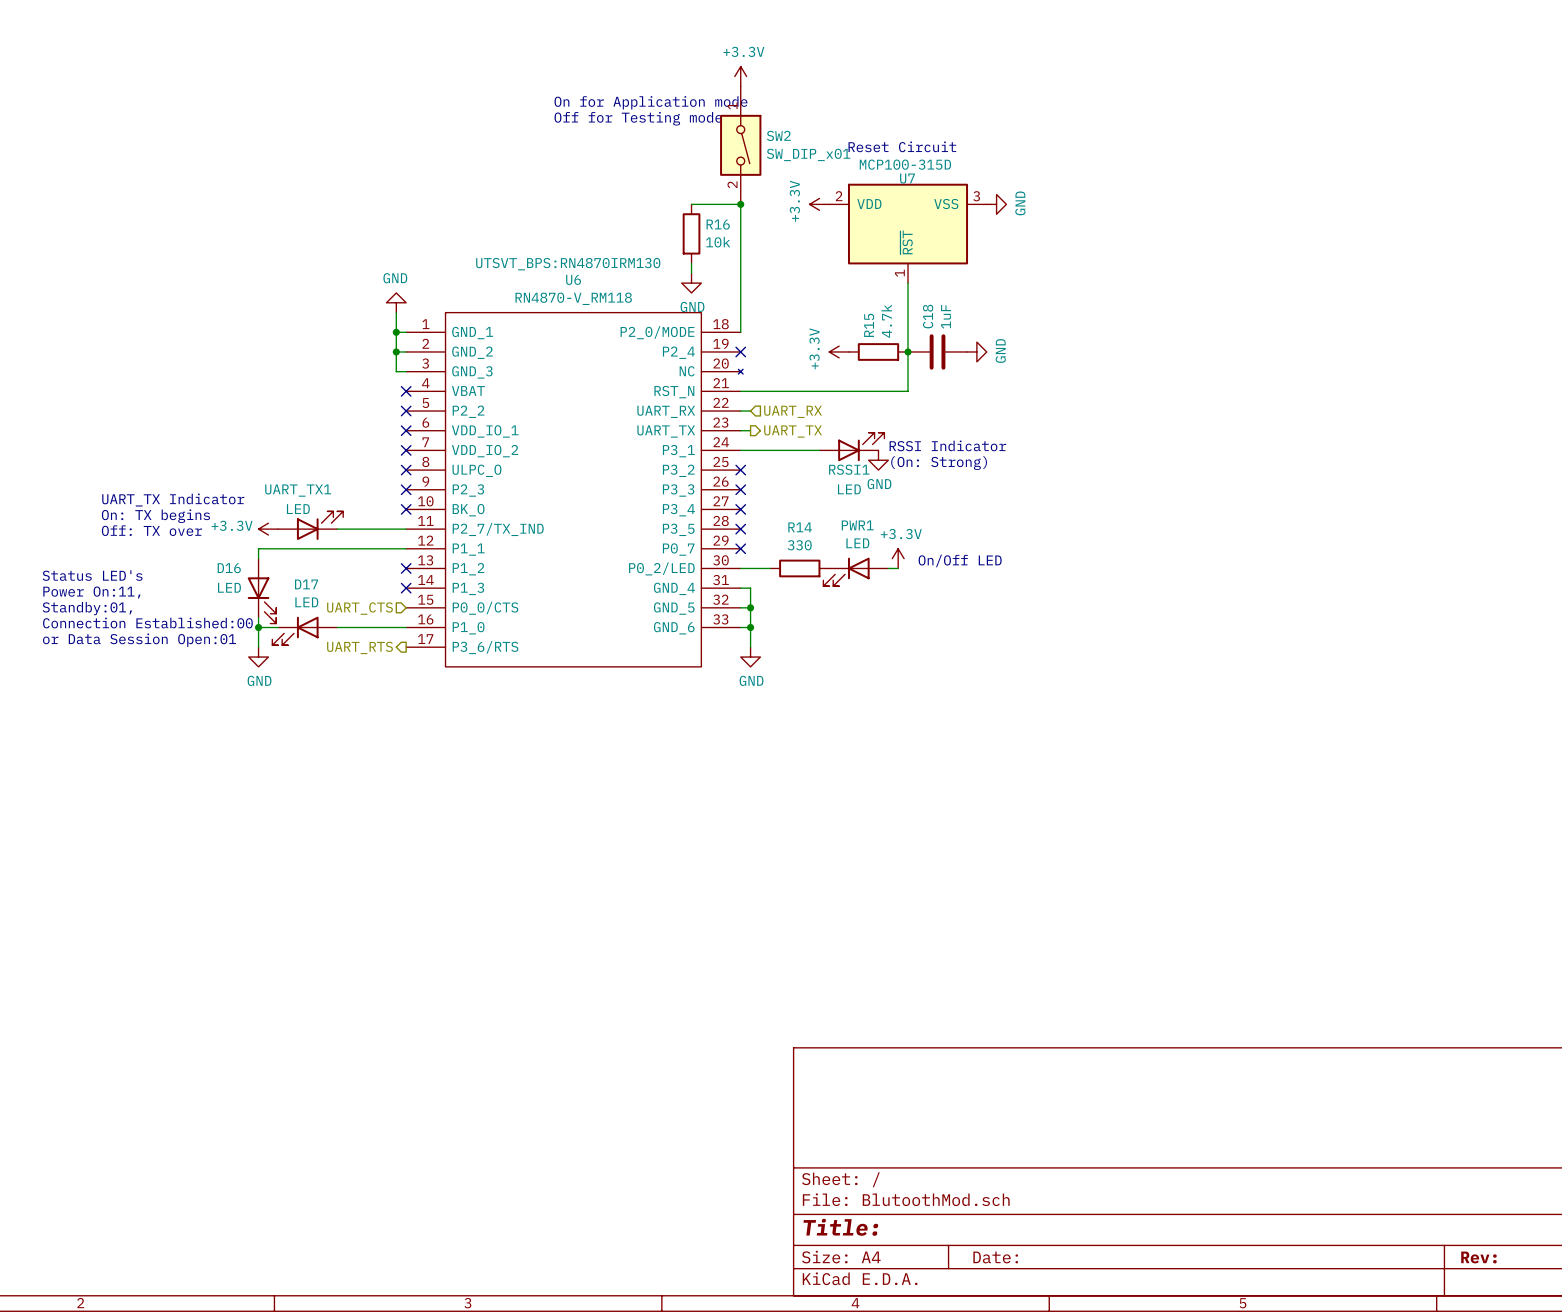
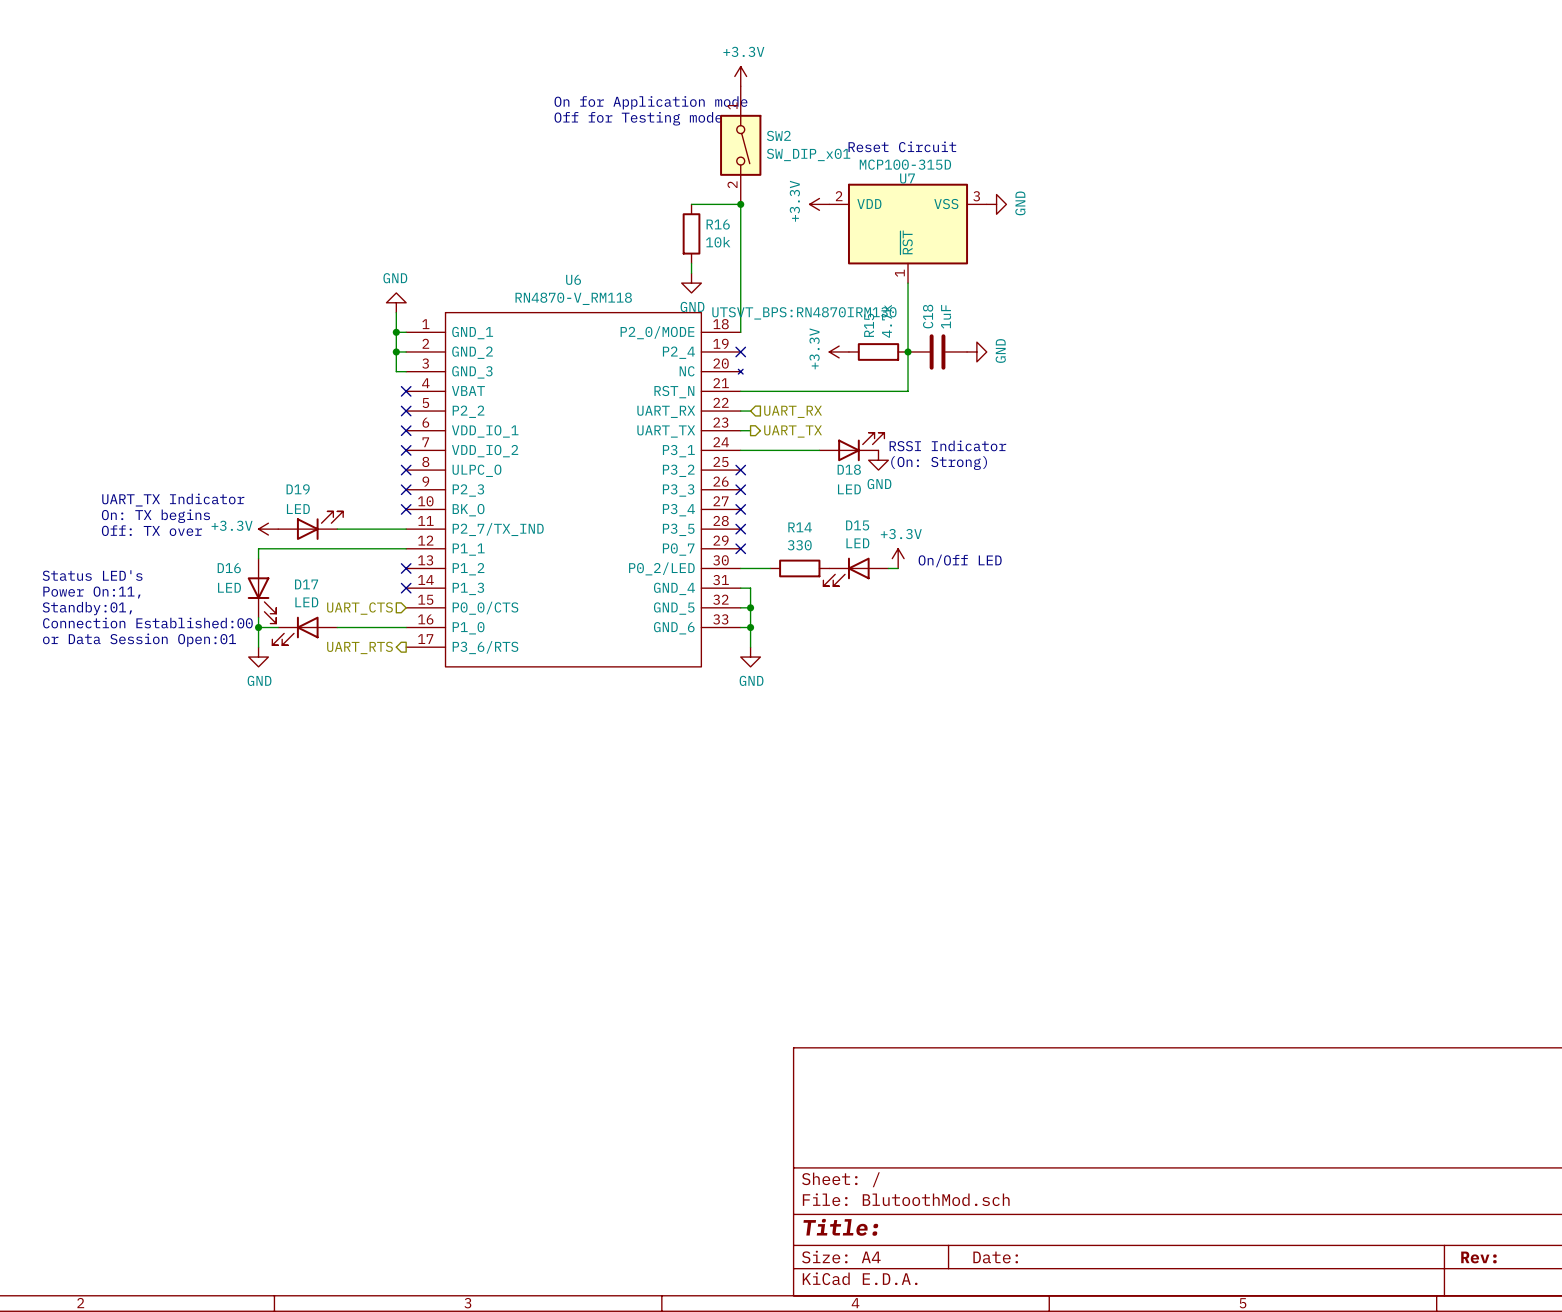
U6 text position: UTSVT_BPS:RN4870IRM130 (568, 264) -> UTSVT_BPS:RN4870IRM130 (804, 313)
RSSI1 name: RSSI1 (849, 469) -> D18 (849, 469)
UART_TX1 name: UART_TX1 (298, 490) -> D19 (298, 489)
PWR1 name: PWR1 (857, 525) -> D15 (857, 525)

